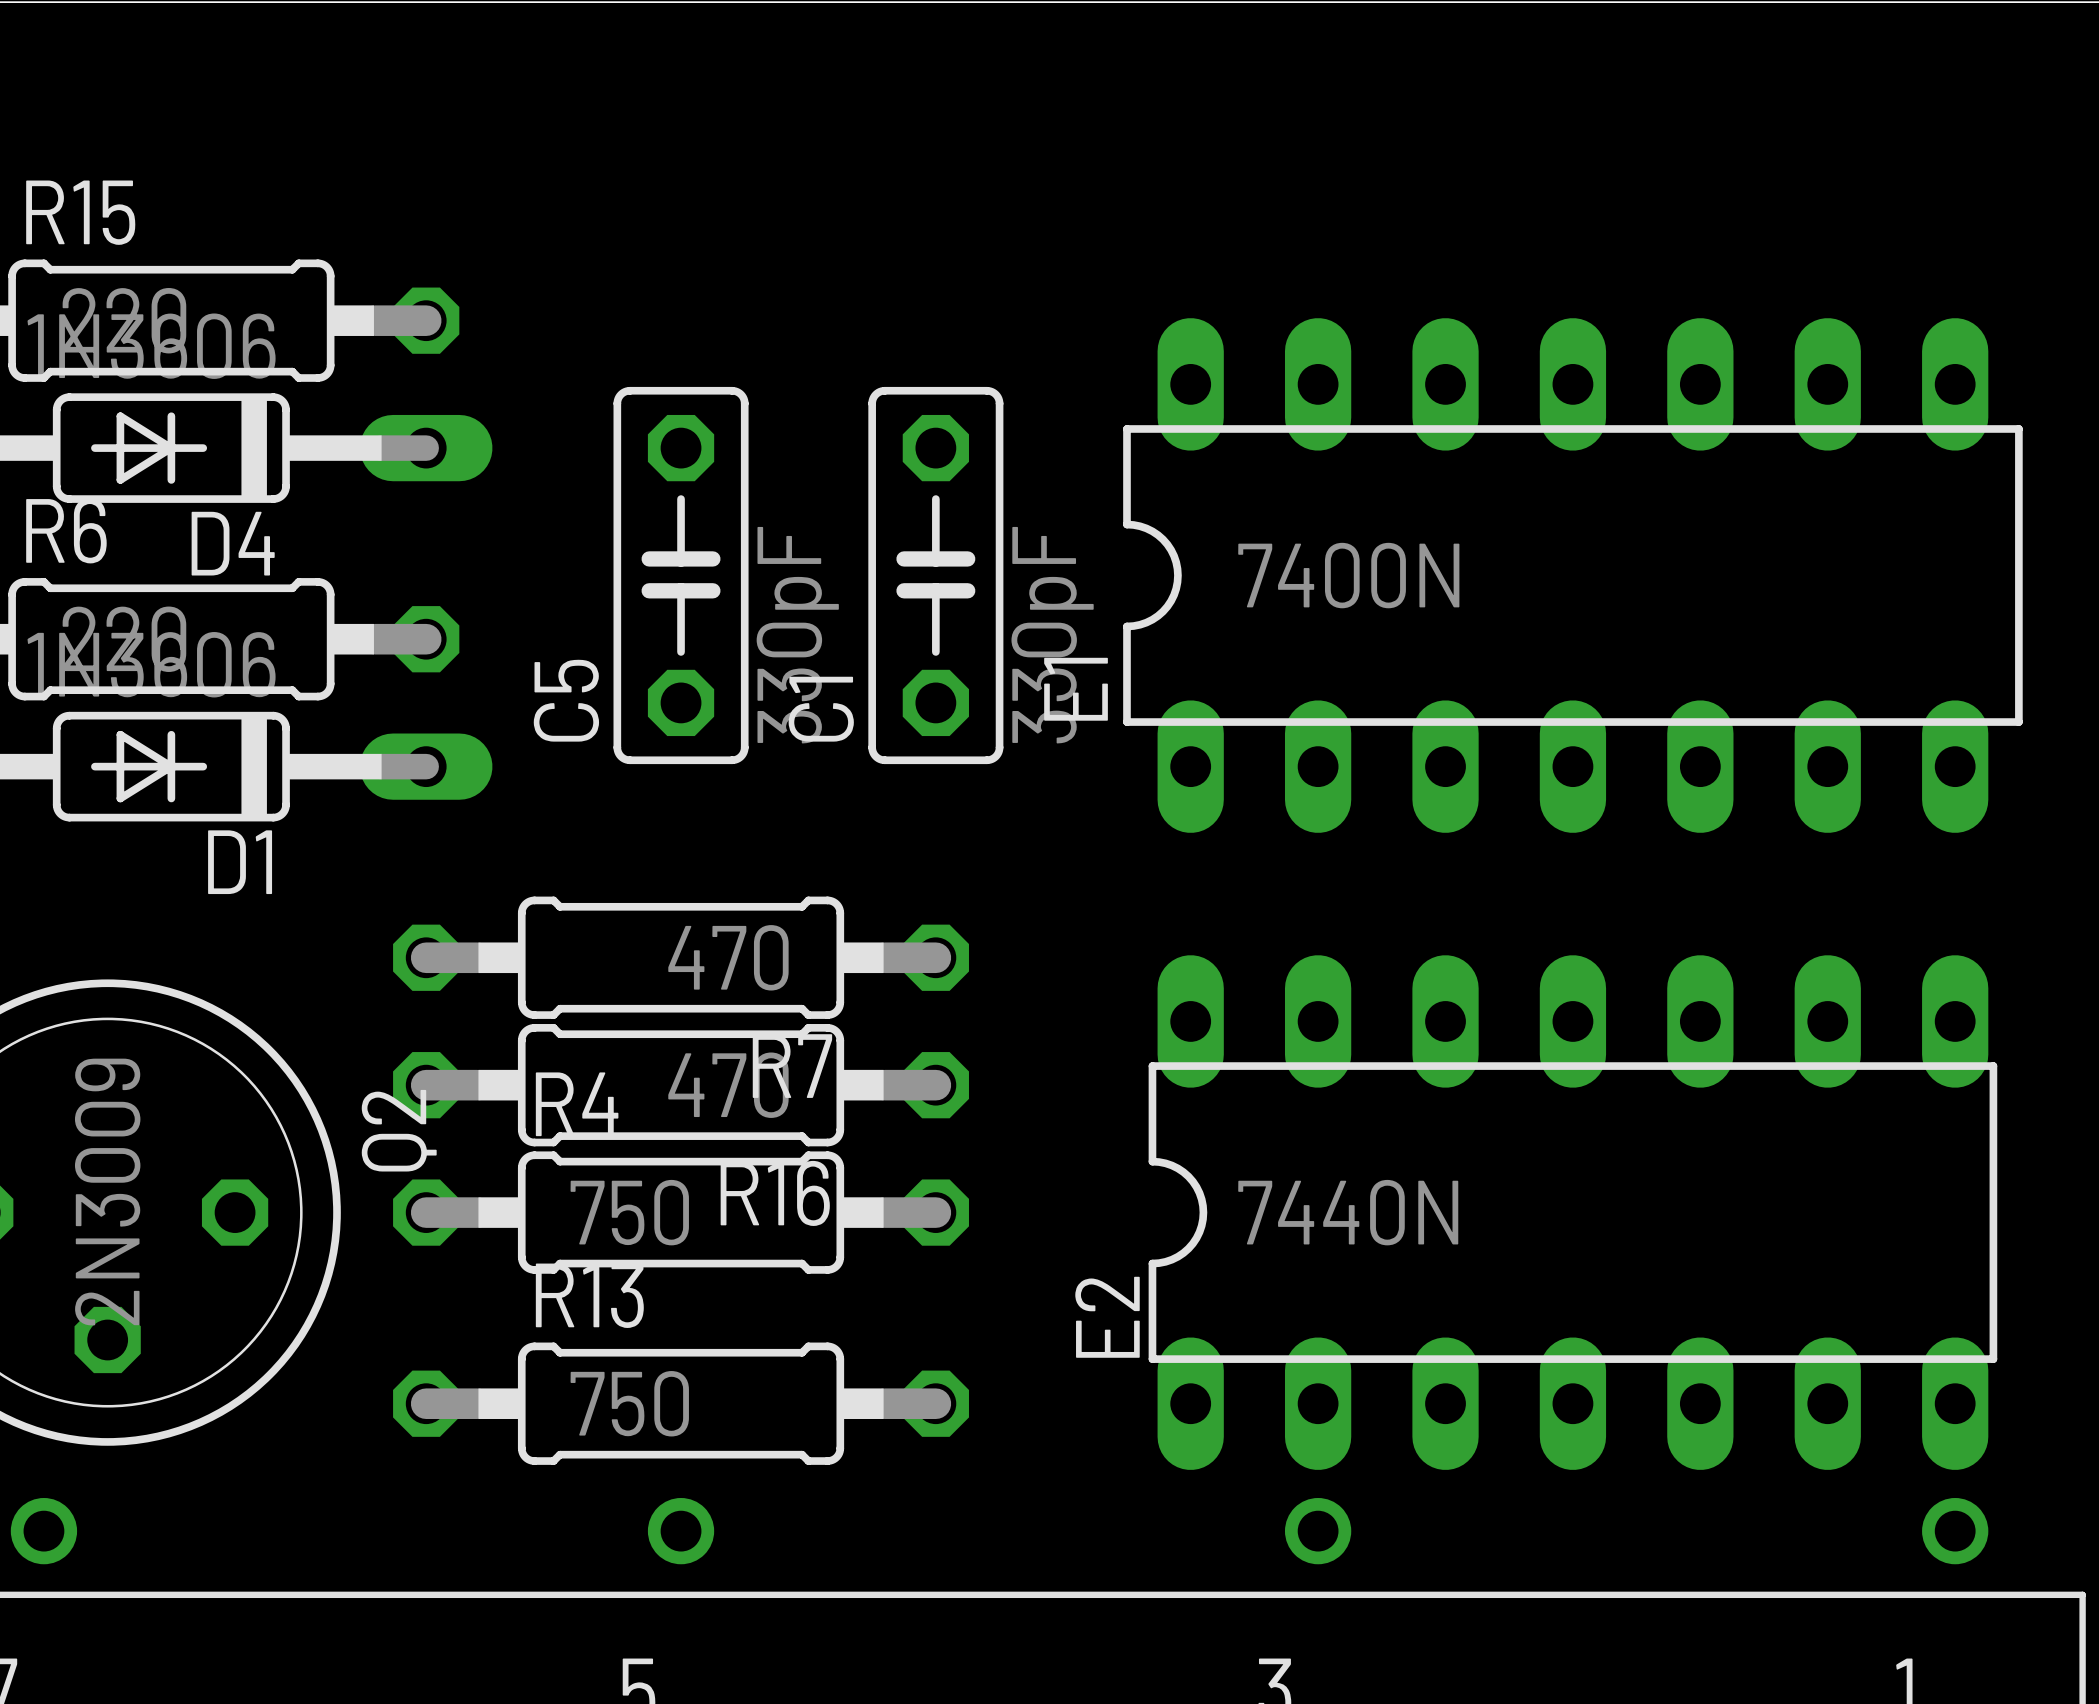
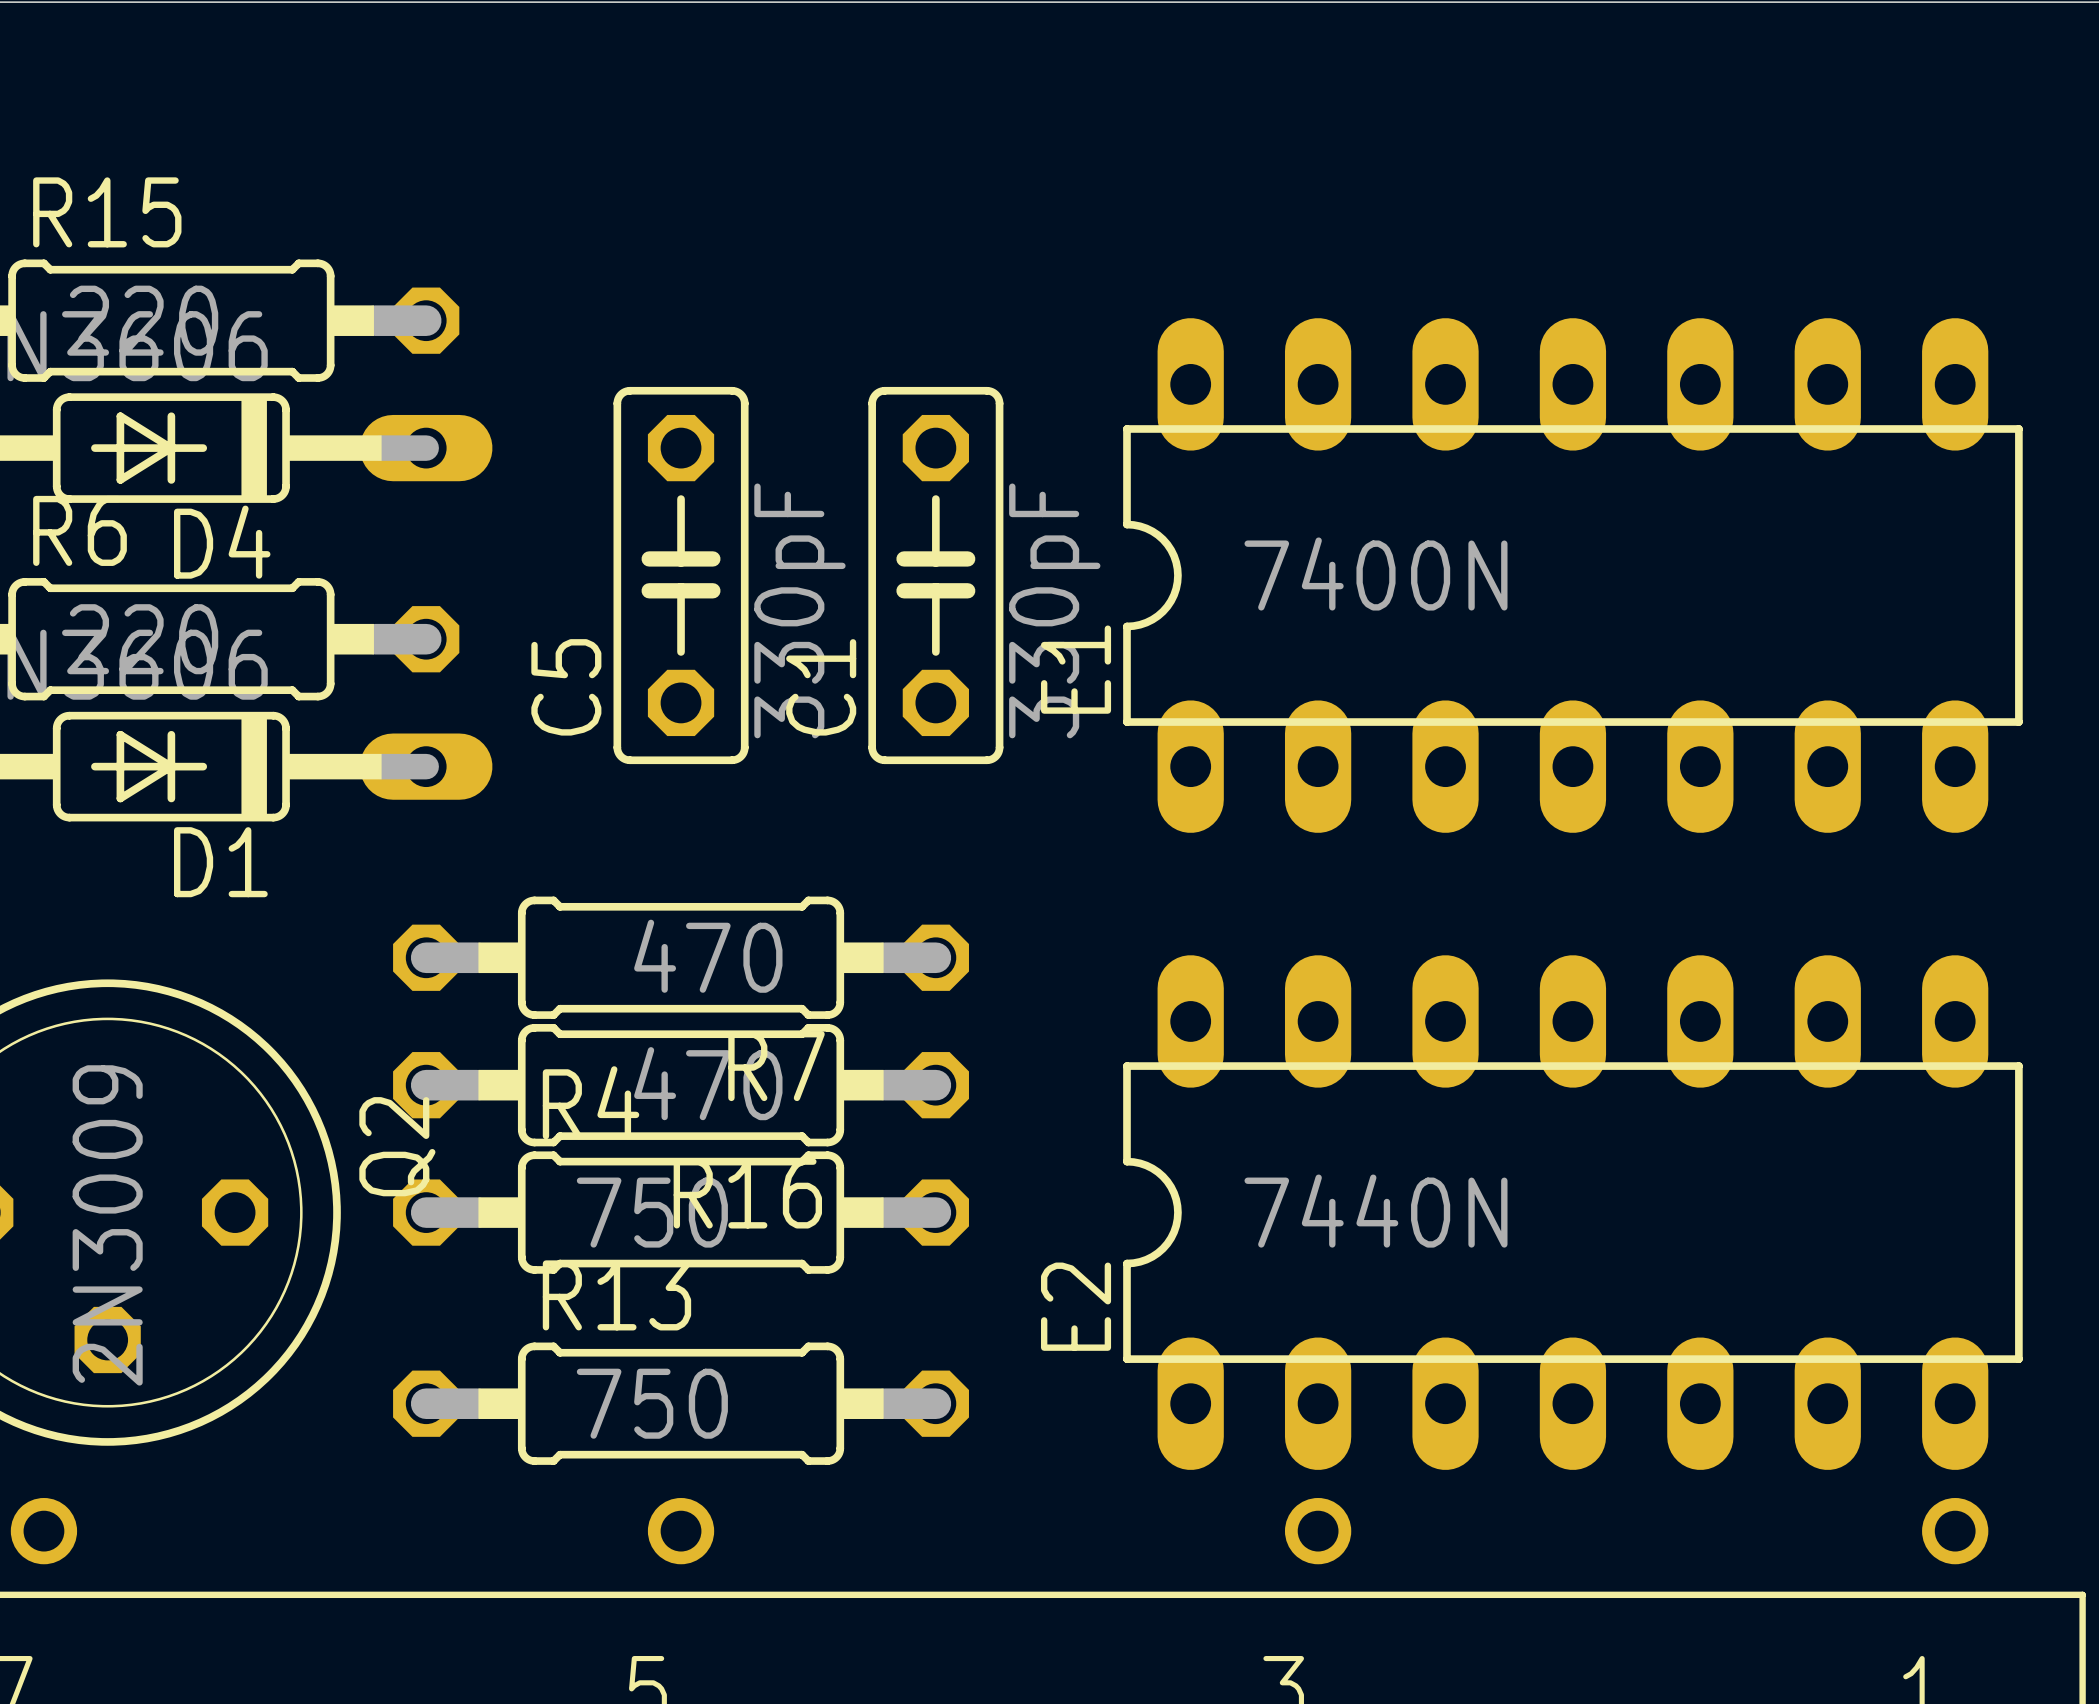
E2 footprint: [1148, 955, 1998, 1470] -> [1123, 955, 2023, 1470]
E2 name position: E2 (1107, 1317) -> E2 (1076, 1306)

